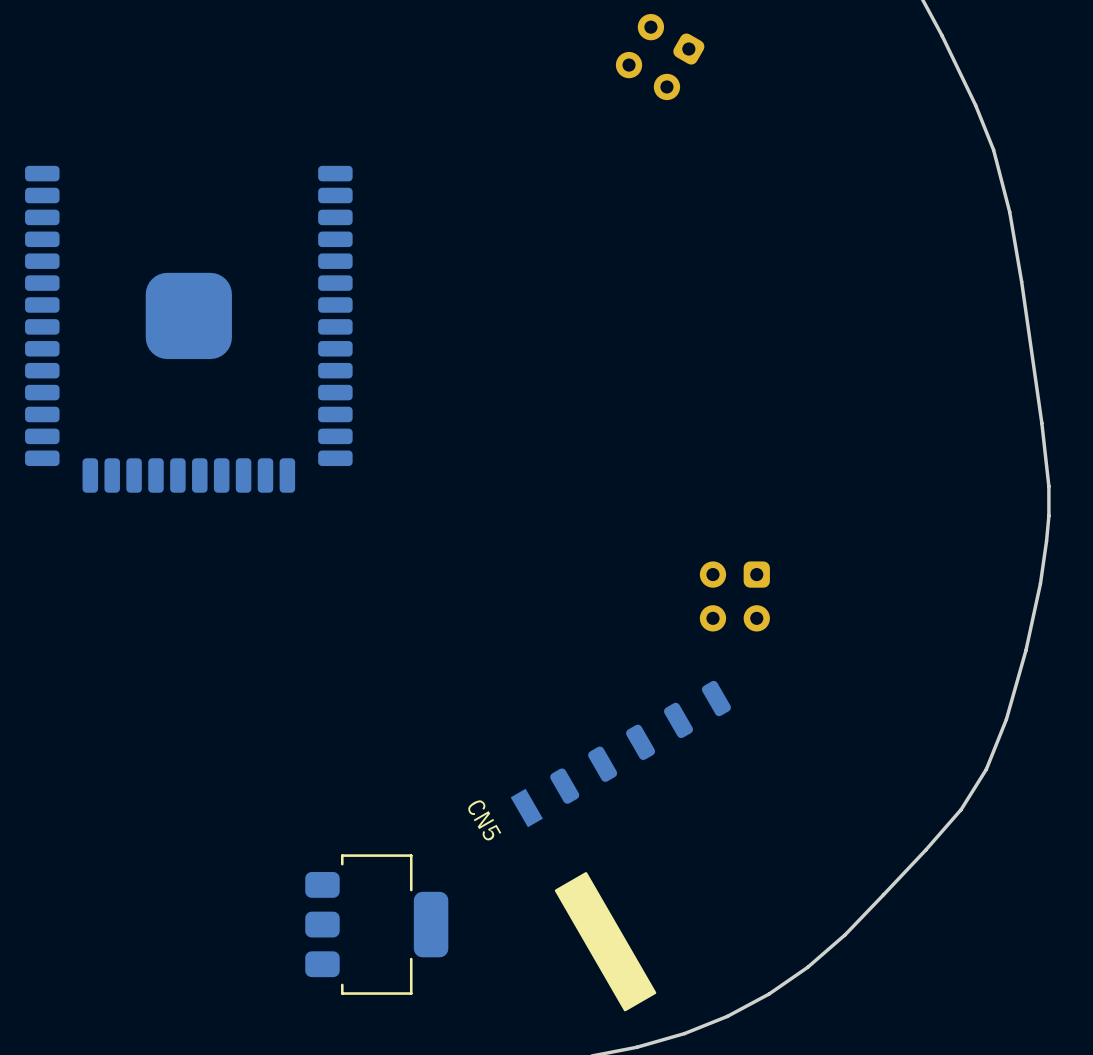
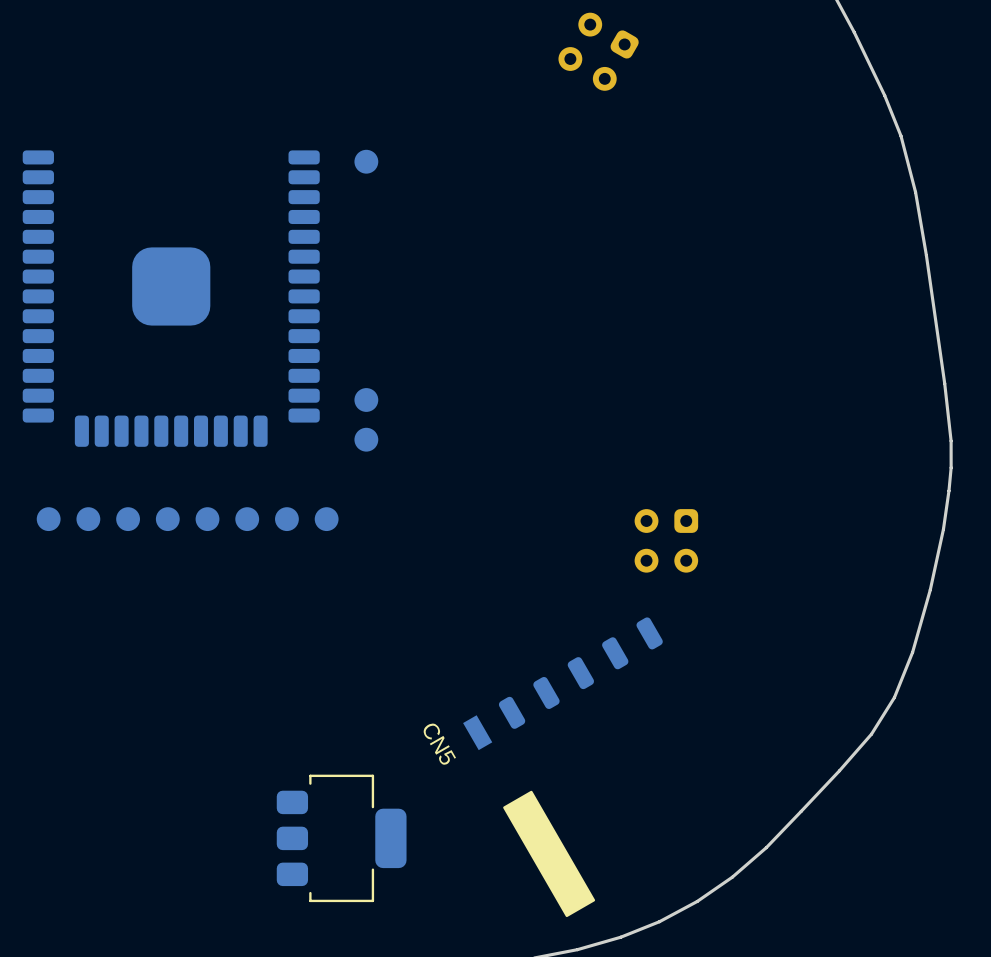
part: none -> (366, 161)
part: none -> (366, 399)
part: none -> (366, 439)
part: none -> (48, 519)
part: none -> (88, 519)
part: none -> (128, 519)
part: none -> (167, 519)
part: none -> (207, 519)
part: none -> (247, 519)
part: none -> (286, 519)
part: none -> (326, 519)

